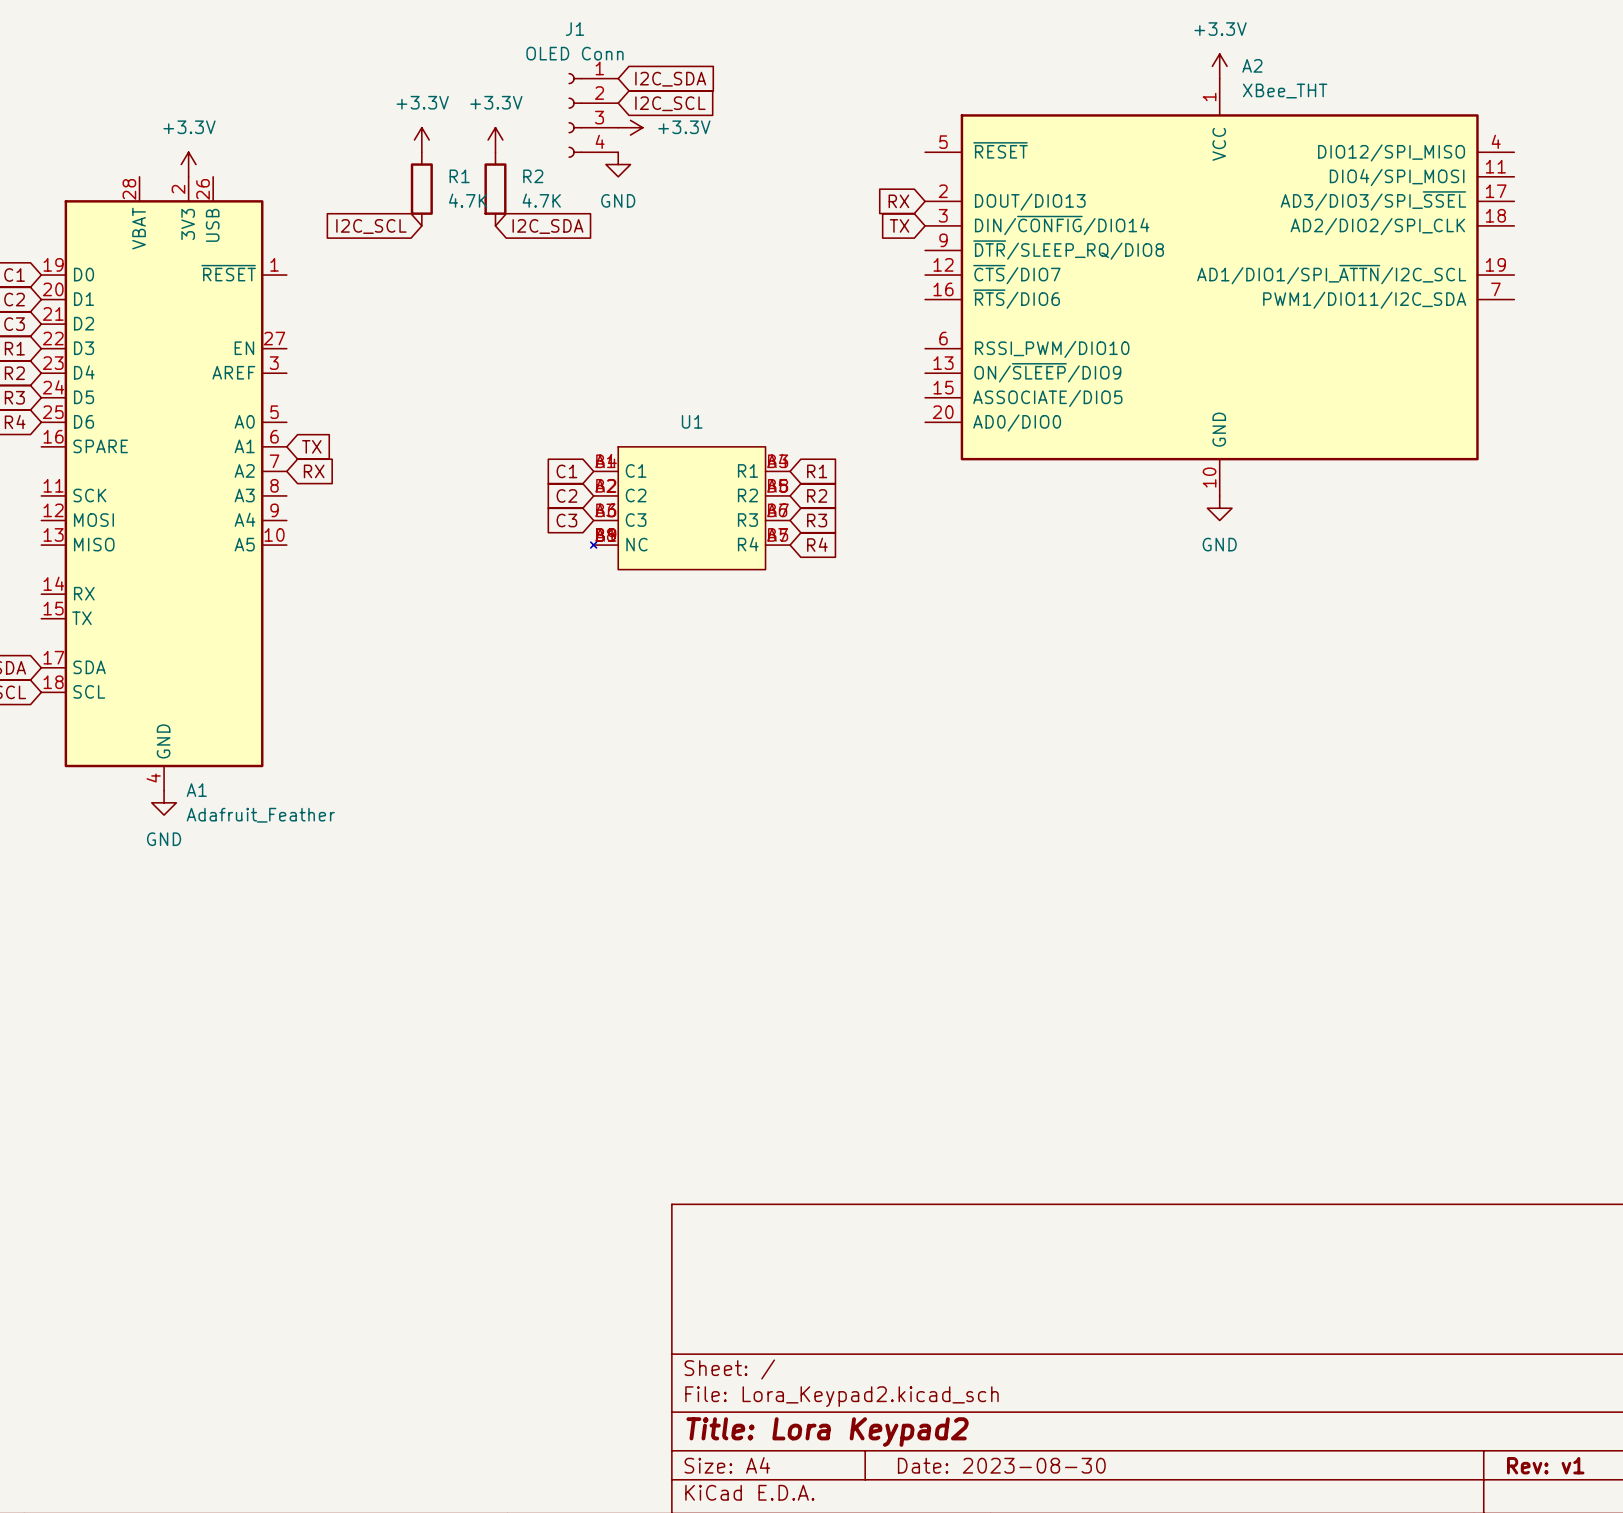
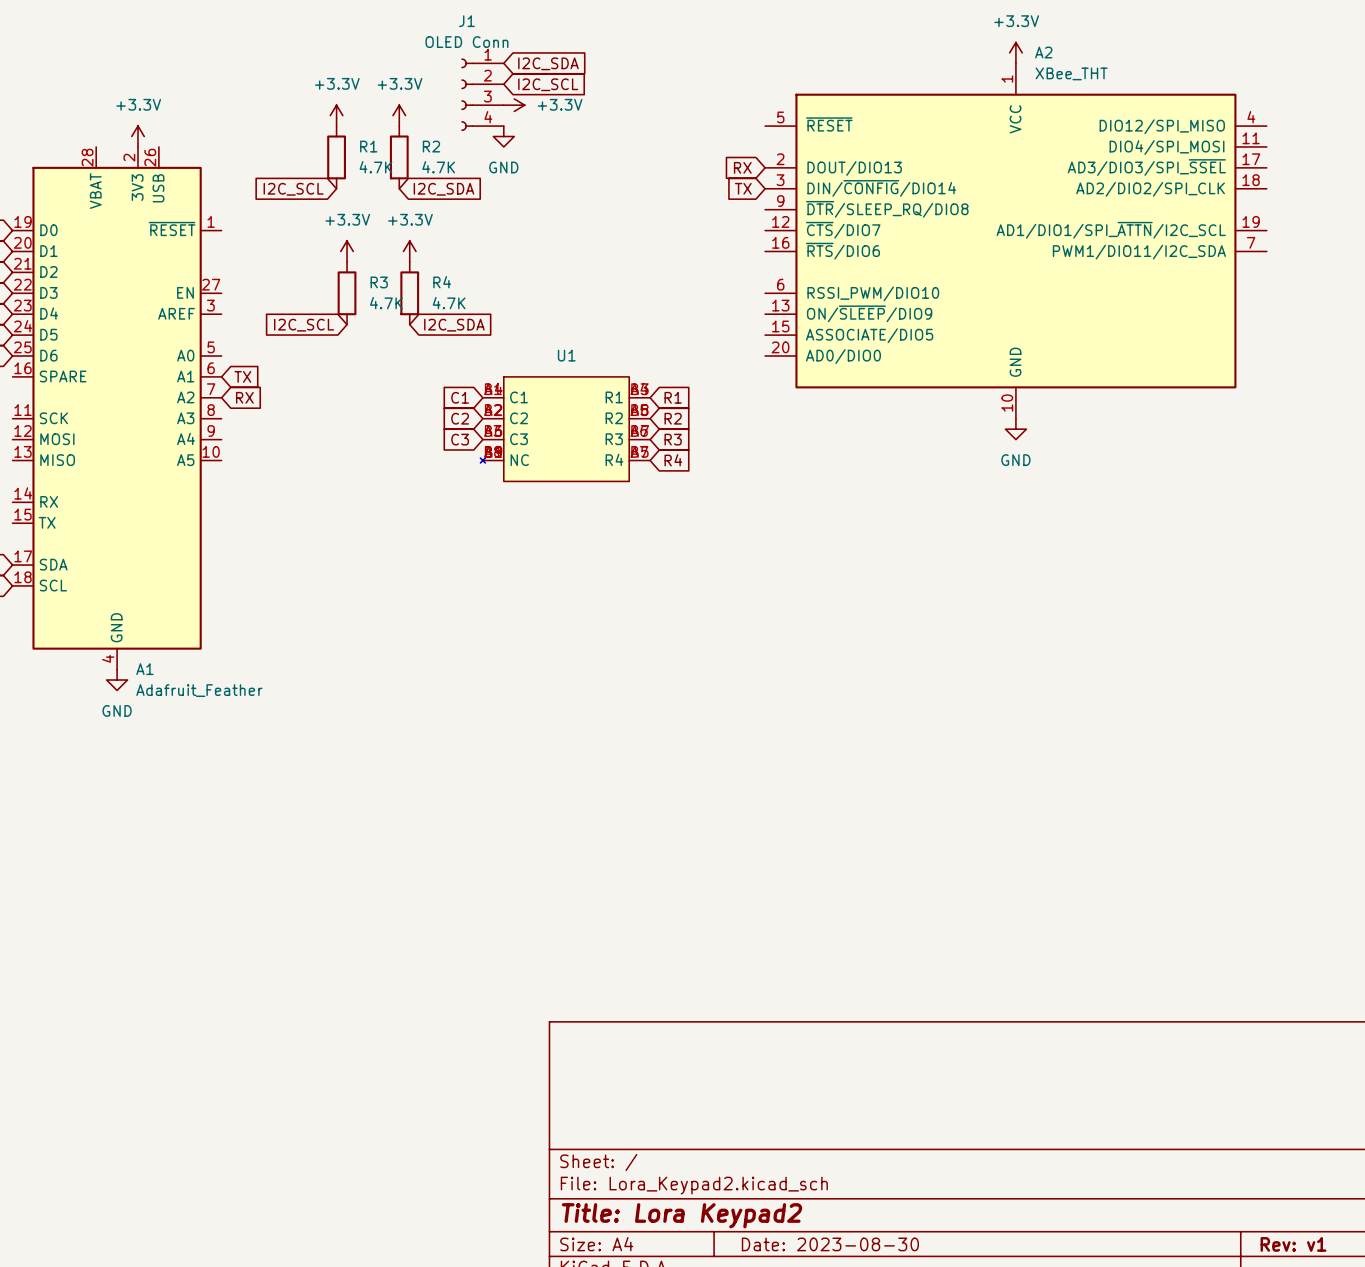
power symbol: none -> +3.3V (347, 251)
power symbol: none -> +3.3V (409, 251)
R3: none -> 4.7K (347, 293)
R4: none -> 4.7K (409, 293)
global label: none -> I2C_SCL (304, 325)
global label: none -> I2C_SDA (454, 325)

